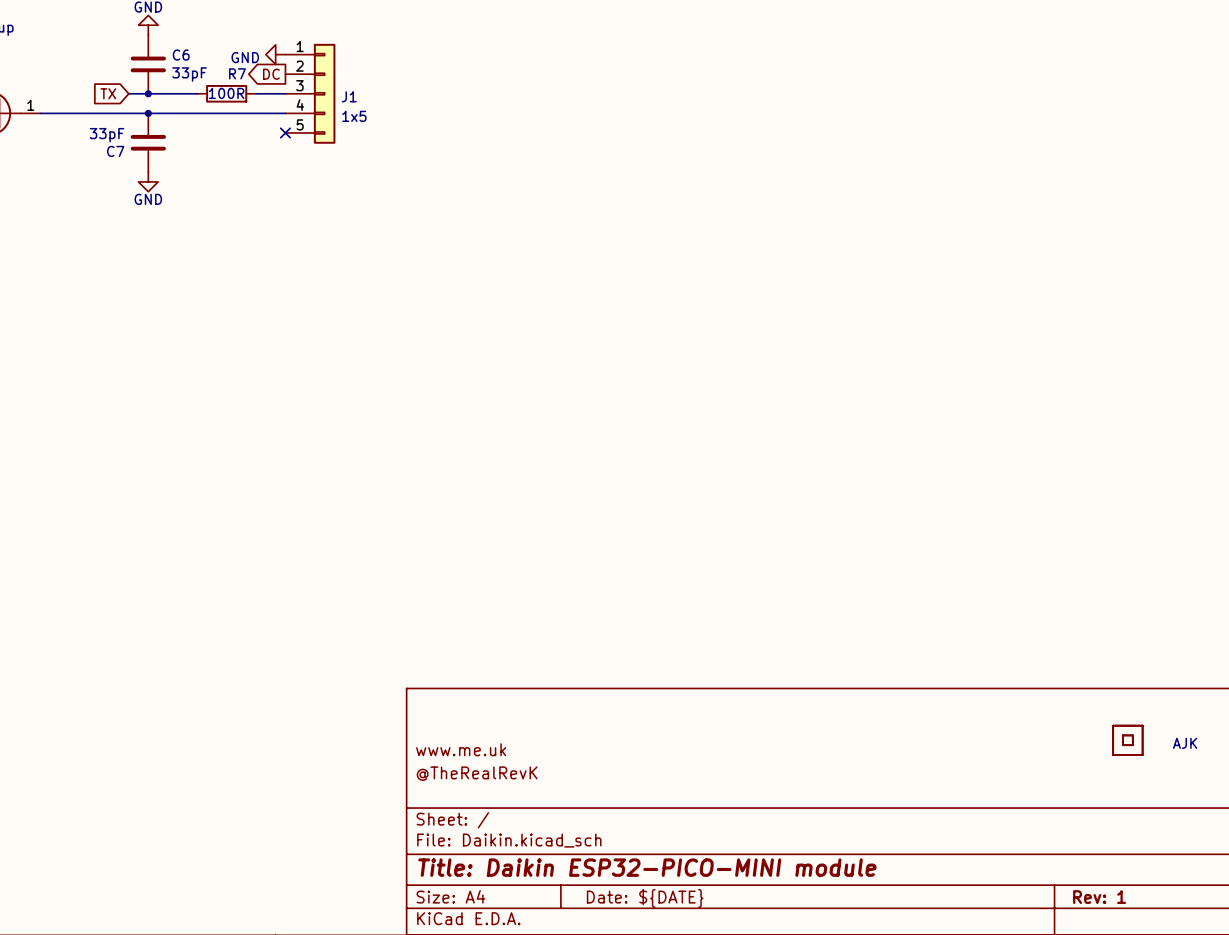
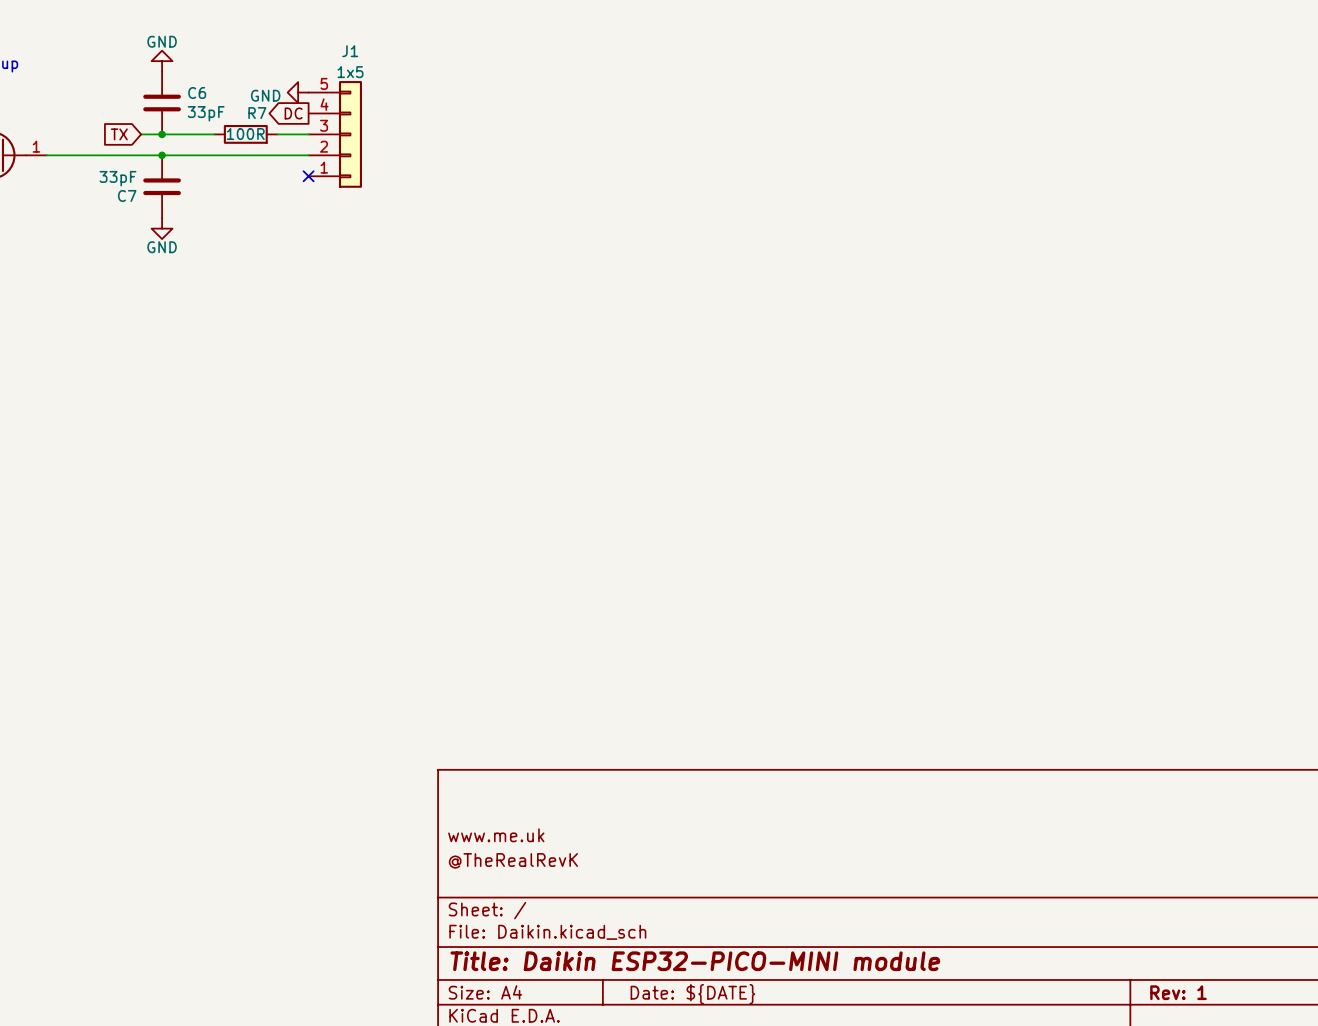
J1 flip: as is (324, 93) -> up-down (350, 134)
J1 name position: J1 (349, 96) -> J1 (350, 51)
J1 value position: 1x5 (354, 116) -> 1x5 (350, 72)
part: (1127, 740) -> none
part: AJK (1185, 743) -> none

